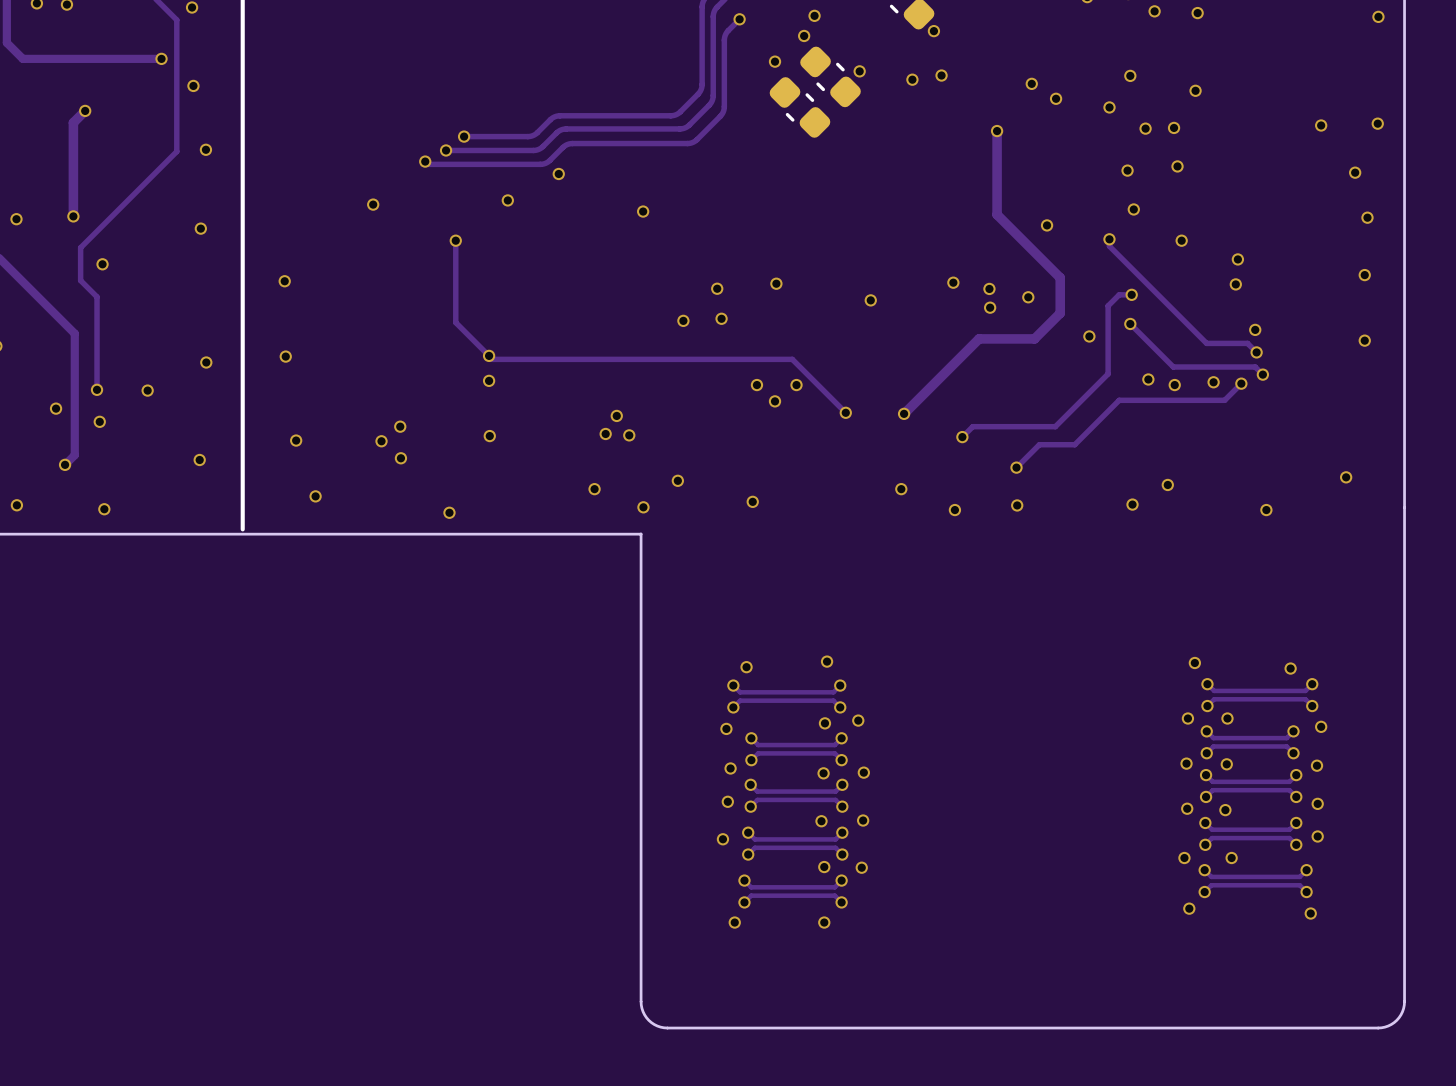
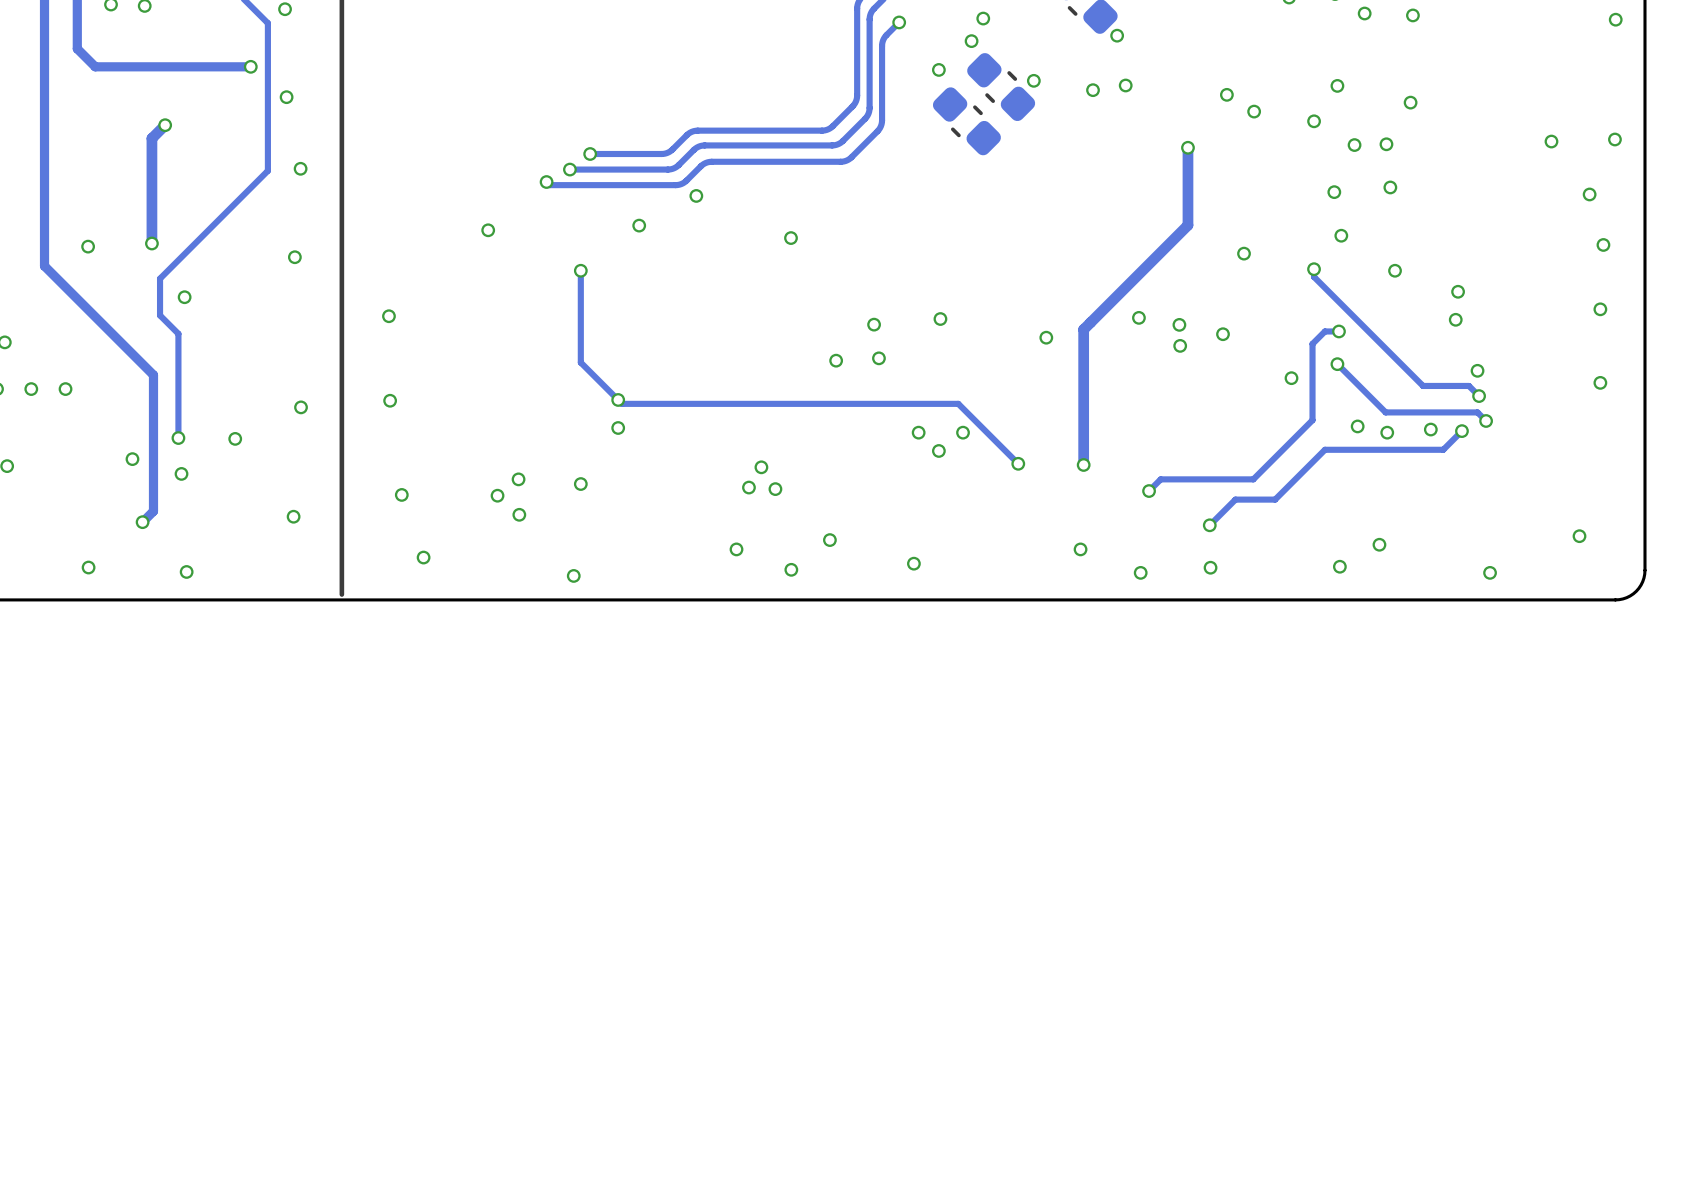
track: (997, 200) (997, 214) (1060, 277) (1060, 313) (1034, 338) (979, 338) (904, 413) -> (1187, 225) (1083, 329) (1083, 464)
via position: (489, 436) -> (580, 484)
board edge: (1404, 507) (1404, 1001) (1402, 1011) (1396, 1020) (1388, 1026) (1378, 1028) (667, 1028) (651, 1022) (643, 1011) (641, 1001) (641, 533) -> (1644, 570) (1642, 581) (1636, 591) (1626, 597) (1615, 599) (788, 599)
via: (827, 661) -> none
via: (1194, 662) -> none
via: (746, 667) -> none
via: (1290, 668) -> none
via: (1207, 684) -> none
track: (1312, 684) (1305, 690) (1214, 690) (1207, 684) -> none
via: (1312, 684) -> none
via: (733, 685) -> none
track: (840, 685) (833, 692) (740, 692) (733, 685) -> none
via: (840, 685) -> none
via: (1207, 706) -> none
track: (1312, 706) (1305, 699) (1214, 699) (1207, 706) -> none
via: (1312, 706) -> none
via: (733, 707) -> none
track: (840, 707) (833, 700) (740, 700) (733, 707) -> none
via: (840, 707) -> none
via: (1187, 718) -> none
via: (1227, 718) -> none
via: (858, 720) -> none
via: (824, 723) -> none
via: (1321, 726) -> none
via: (726, 728) -> none
via: (1206, 731) -> none
track: (1293, 731) (1286, 738) (1213, 738) (1206, 731) -> none
via: (1293, 731) -> none
via: (751, 738) -> none
track: (841, 738) (834, 745) (758, 745) (751, 738) -> none
via: (841, 738) -> none
via: (1206, 753) -> none
track: (1293, 753) (1286, 746) (1213, 746) (1206, 753) -> none
via: (1293, 753) -> none
via: (751, 760) -> none
track: (841, 760) (834, 753) (758, 753) (751, 760) -> none
via: (841, 760) -> none
via: (1186, 763) -> none
via: (1226, 764) -> none
via: (1317, 765) -> none
via: (730, 768) -> none
via: (863, 772) -> none
via: (823, 773) -> none
via: (1206, 775) -> none
track: (1296, 775) (1289, 781) (1212, 781) (1206, 775) -> none
via: (1296, 775) -> none
via: (750, 784) -> none
track: (842, 784) (835, 791) (757, 791) (750, 784) -> none
via: (842, 784) -> none
via: (1206, 796) -> none
track: (1296, 796) (1289, 790) (1212, 790) (1206, 796) -> none
via: (1296, 796) -> none
via: (727, 801) -> none
via: (1317, 803) -> none
via: (750, 806) -> none
track: (842, 806) (835, 799) (757, 799) (750, 806) -> none
via: (842, 806) -> none
via: (1187, 808) -> none
via: (1225, 810) -> none
via: (863, 820) -> none
via: (821, 821) -> none
via: (1205, 822) -> none
track: (1296, 822) (1289, 829) (1212, 829) (1205, 822) -> none
via: (1296, 822) -> none
via: (748, 832) -> none
track: (842, 832) (835, 839) (754, 839) (748, 832) -> none
via: (842, 832) -> none
via: (1317, 836) -> none
via: (722, 839) -> none
via: (1205, 844) -> none
track: (1296, 844) (1289, 838) (1212, 838) (1205, 844) -> none
via: (1296, 844) -> none
via: (748, 854) -> none
track: (842, 854) (835, 847) (754, 847) (748, 854) -> none
via: (842, 854) -> none
via: (1184, 858) -> none
via: (1231, 858) -> none
via: (824, 867) -> none
via: (861, 867) -> none
via: (1204, 870) -> none
track: (1306, 870) (1299, 876) (1211, 876) (1204, 870) -> none
via: (1306, 870) -> none
via: (744, 880) -> none
track: (841, 880) (834, 887) (751, 887) (744, 880) -> none
via: (841, 880) -> none
via: (1204, 892) -> none
track: (1306, 892) (1299, 885) (1211, 885) (1204, 892) -> none
via: (1306, 892) -> none
via: (744, 902) -> none
track: (841, 902) (834, 895) (751, 895) (744, 902) -> none
via: (841, 902) -> none
via: (1189, 908) -> none
via: (1310, 913) -> none
via: (734, 922) -> none
via: (824, 922) -> none

